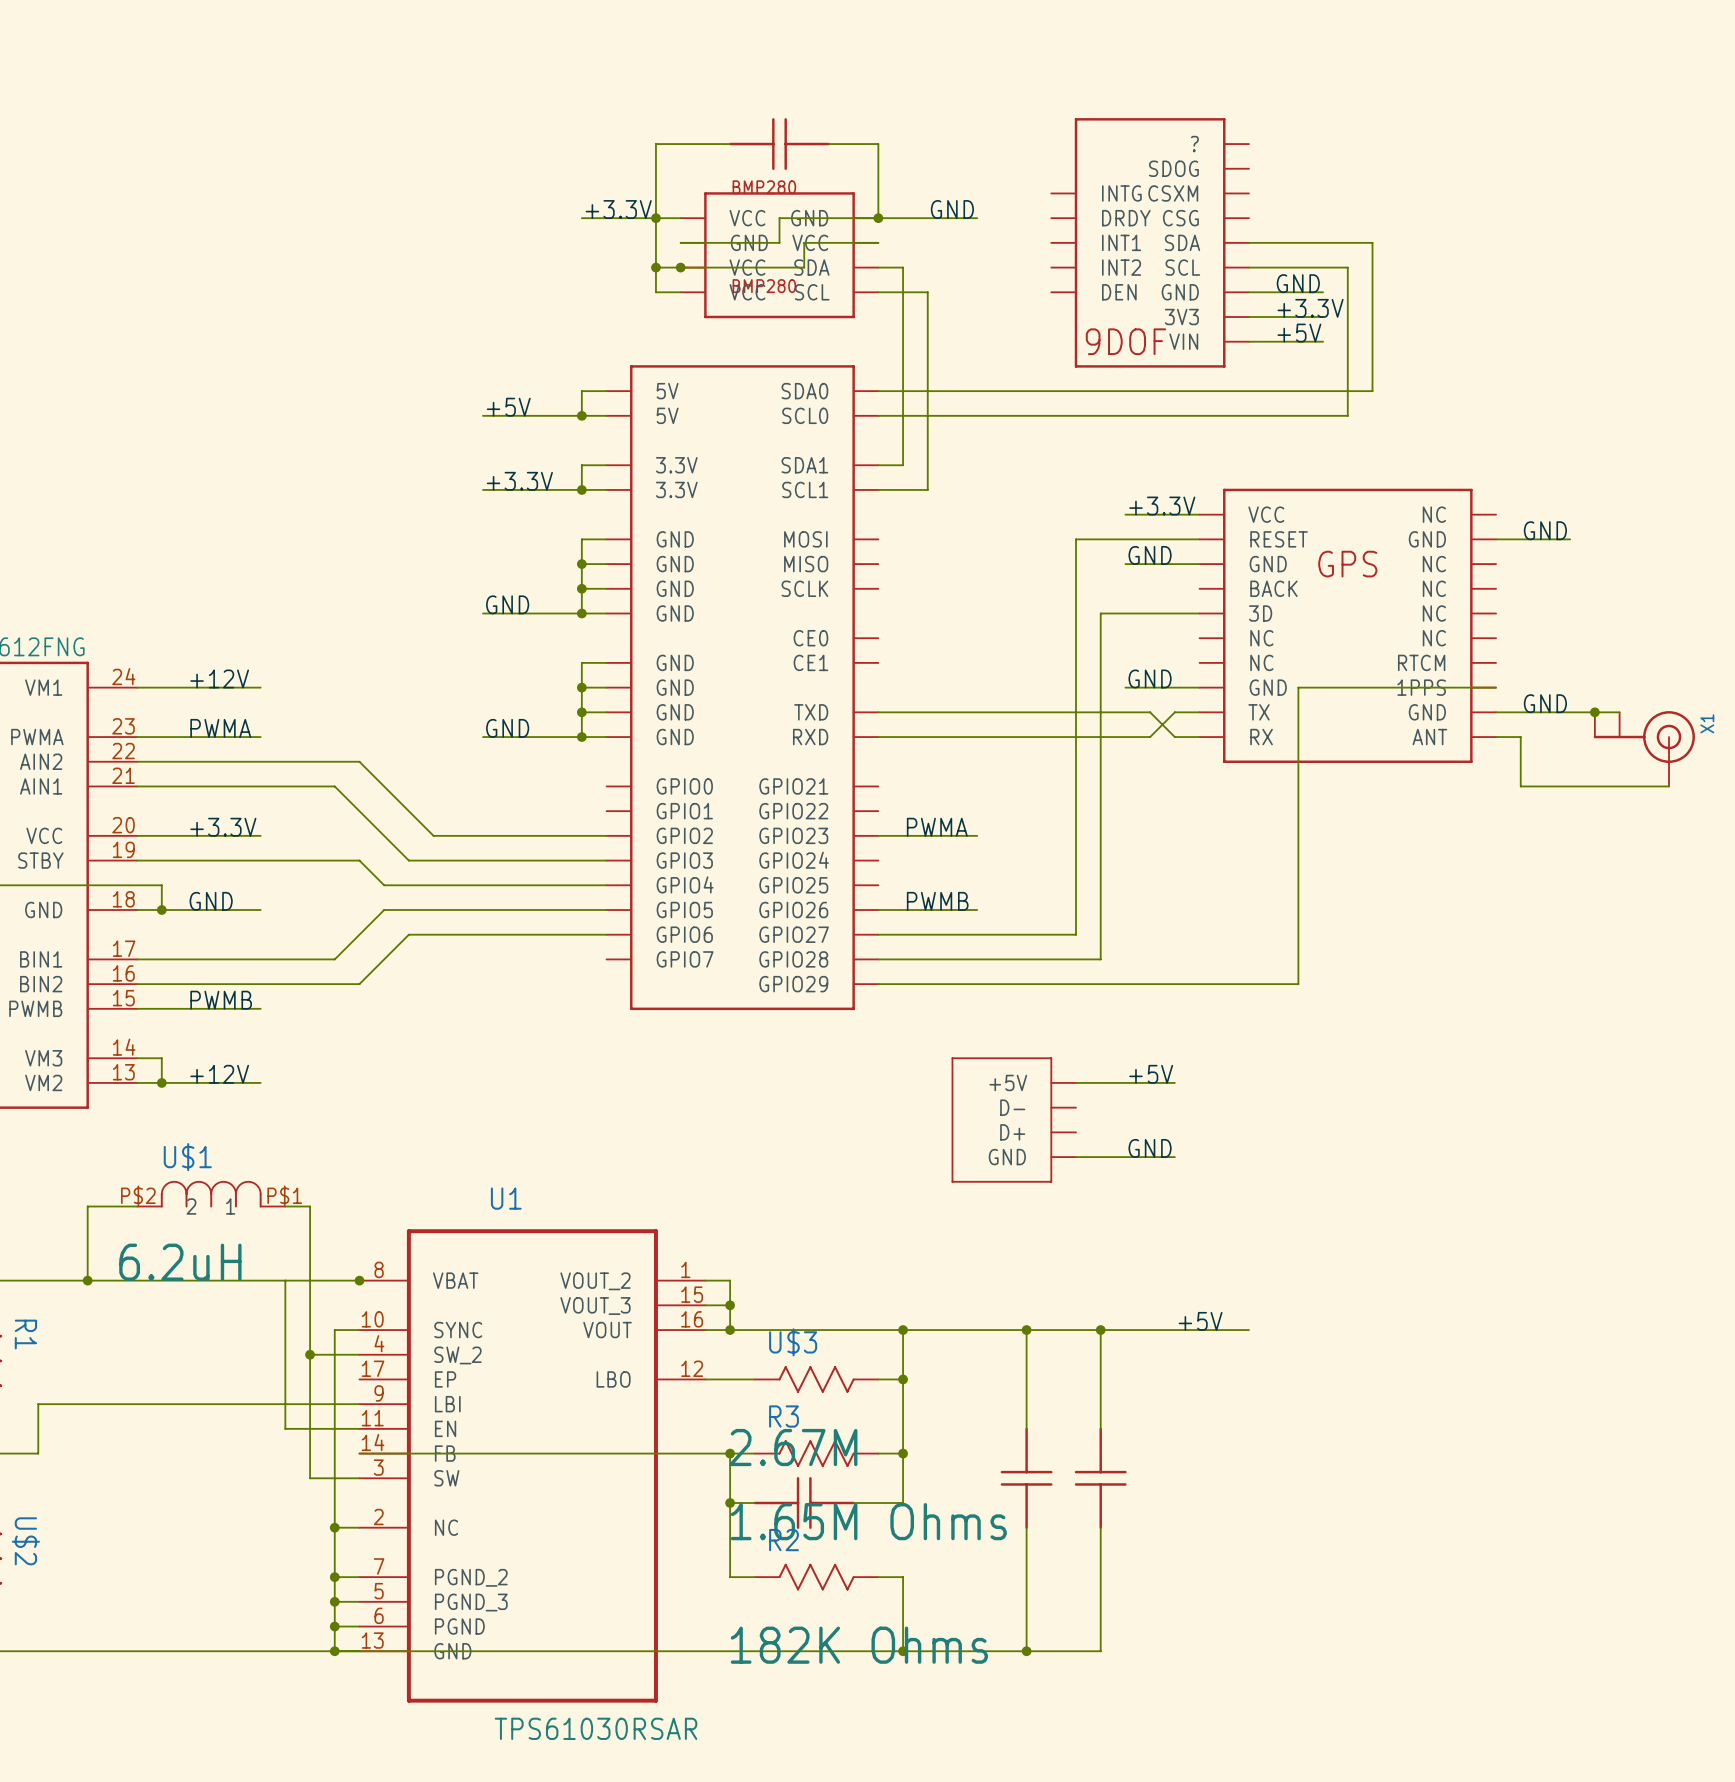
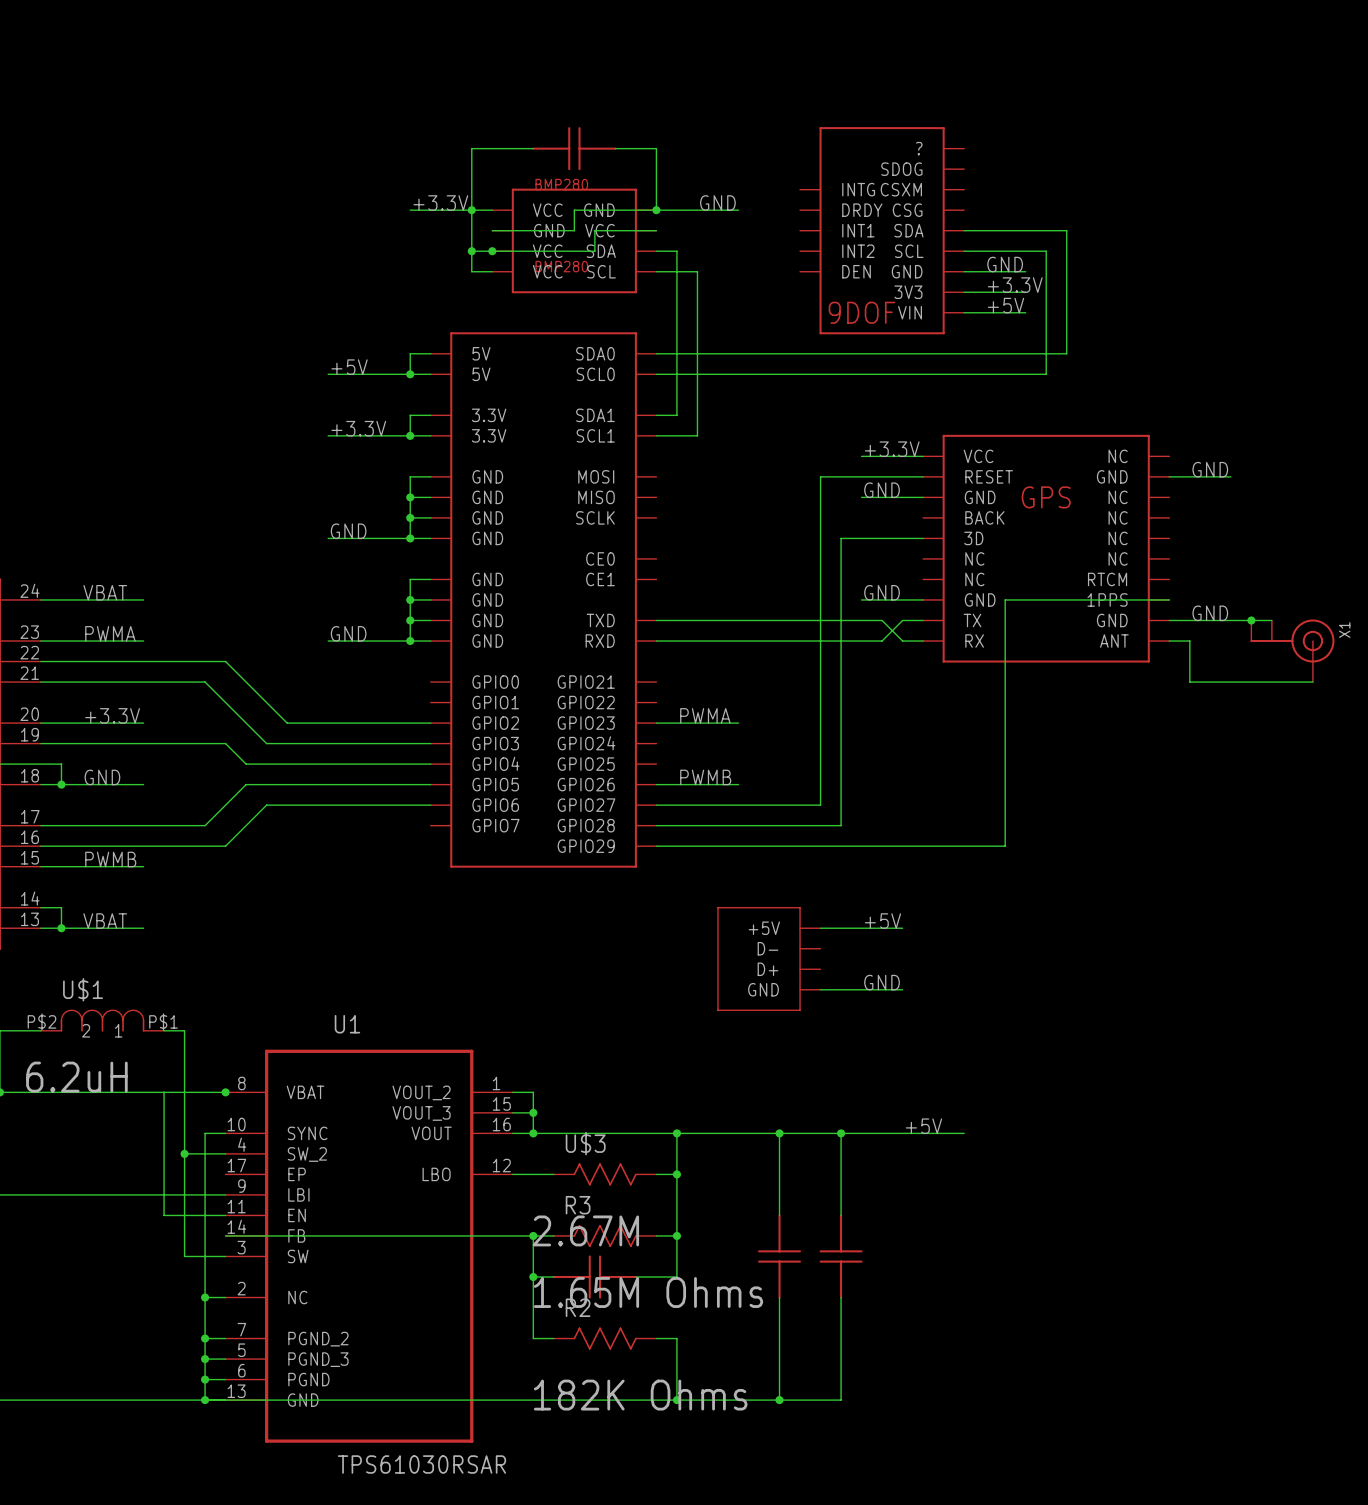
label: +12V (219, 678) -> VBAT (105, 592)
label: +12V (219, 1074) -> VBAT (105, 921)

